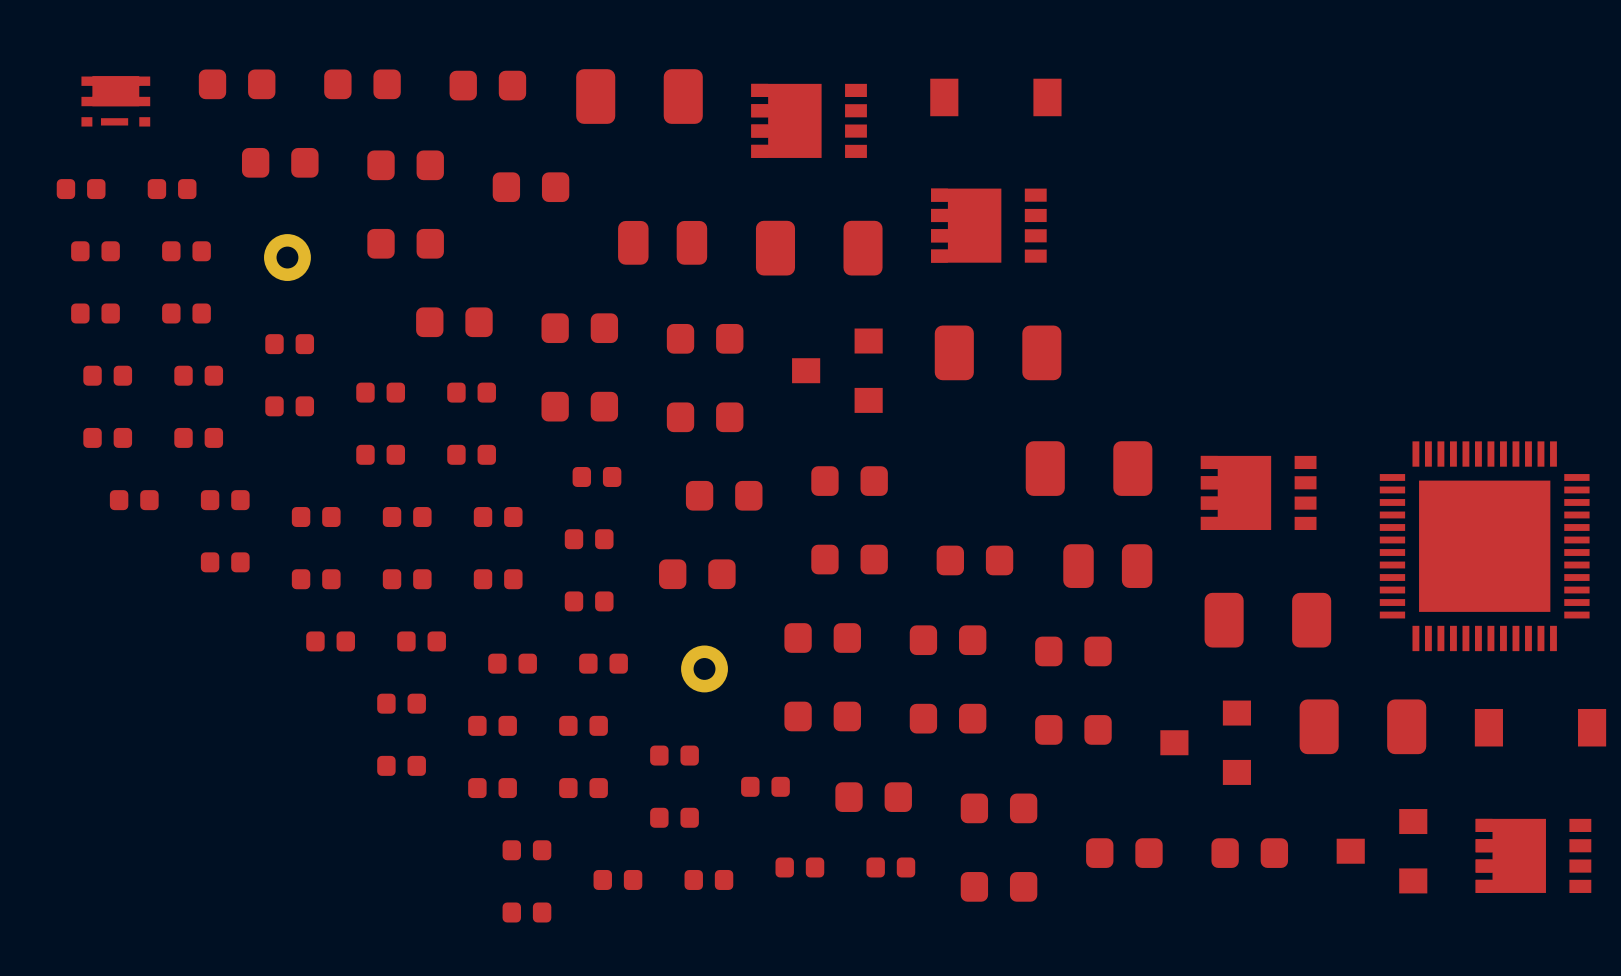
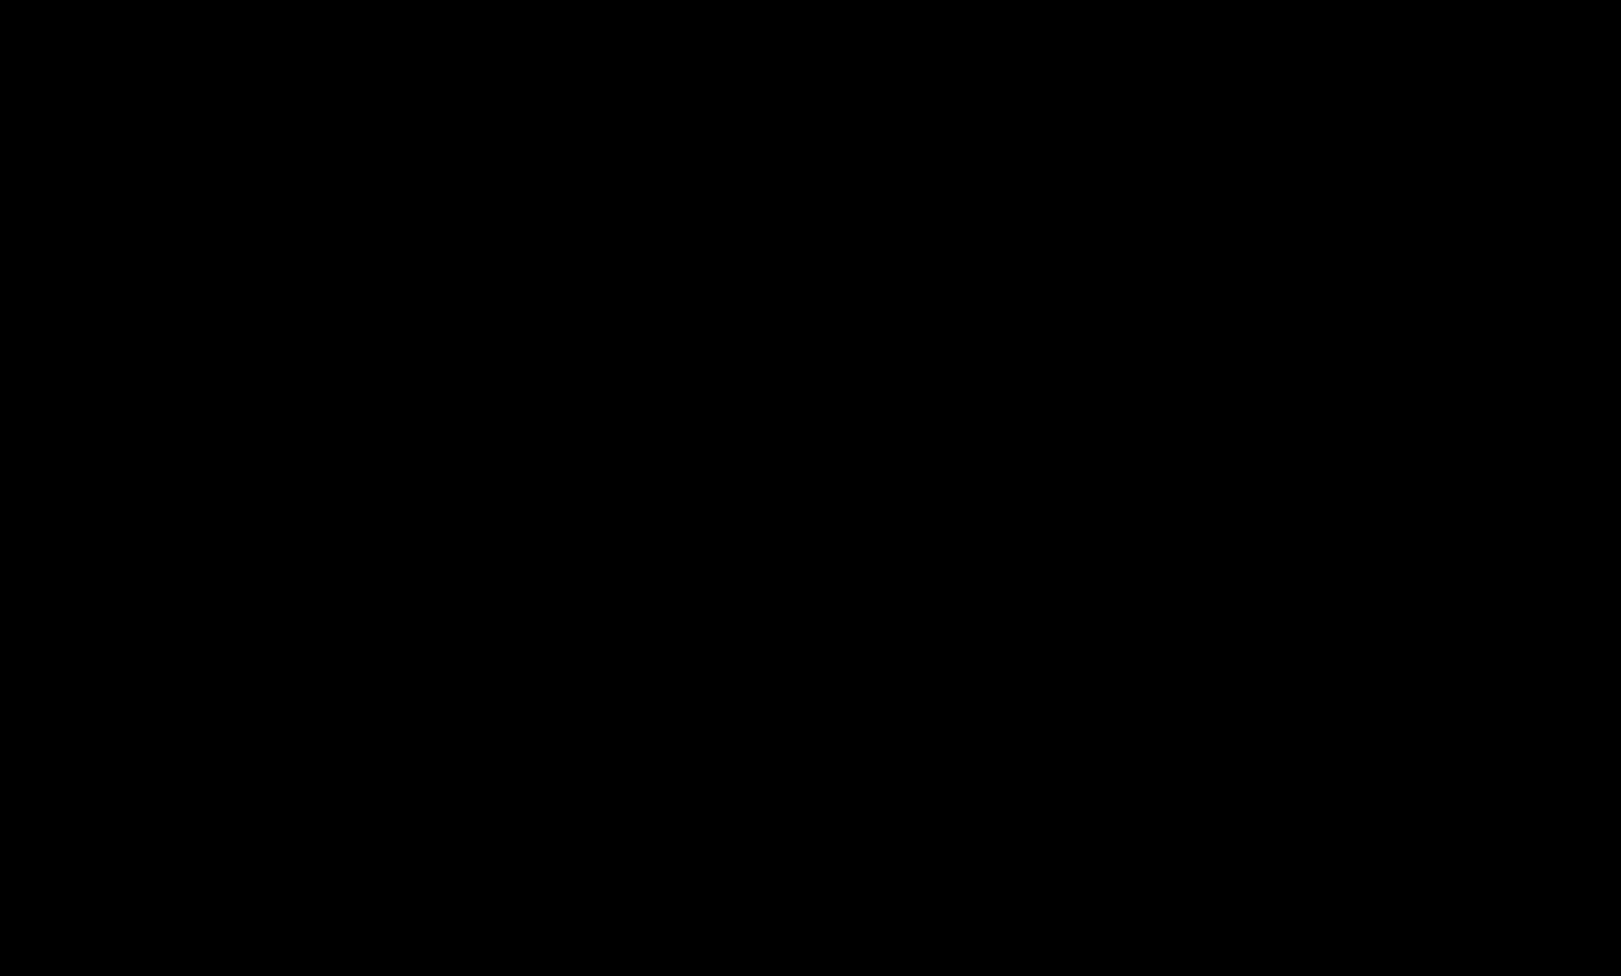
part: (237, 84) -> none
part: (362, 84) -> none
part: (487, 85) -> none
part: (639, 96) -> none
part: (995, 97) -> none
part: (115, 101) -> none
part: (809, 120) -> none
part: (280, 162) -> none
part: (405, 165) -> none
part: (531, 187) -> none
part: (81, 189) -> none
part: (172, 189) -> none
part: (988, 225) -> none
part: (662, 242) -> none
part: (405, 243) -> none
part: (819, 248) -> none
part: (95, 251) -> none
part: (186, 251) -> none
part: (287, 257) -> none
part: (95, 313) -> none
part: (186, 313) -> none
part: (454, 322) -> none
part: (579, 328) -> none
part: (705, 338) -> none
part: (289, 344) -> none
part: (998, 352) -> none
part: (837, 370) -> none
part: (107, 375) -> none
part: (198, 375) -> none
part: (380, 392) -> none
part: (471, 392) -> none
part: (289, 406) -> none
part: (579, 406) -> none
part: (705, 417) -> none
part: (107, 437) -> none
part: (198, 437) -> none
part: (380, 454) -> none
part: (471, 454) -> none
part: (1089, 468) -> none
part: (596, 477) -> none
part: (849, 481) -> none
part: (1258, 492) -> none
part: (724, 495) -> none
part: (134, 500) -> none
part: (225, 500) -> none
part: (316, 517) -> none
part: (407, 517) -> none
part: (498, 517) -> none
part: (589, 539) -> none
part: (1484, 546) -> none
part: (849, 559) -> none
part: (974, 560) -> none
part: (225, 562) -> none
part: (1107, 566) -> none
part: (697, 574) -> none
part: (316, 579) -> none
part: (407, 579) -> none
part: (498, 579) -> none
part: (589, 601) -> none
part: (1267, 620) -> none
part: (822, 638) -> none
part: (948, 640) -> none
part: (330, 641) -> none
part: (421, 641) -> none
part: (1073, 651) -> none
part: (512, 663) -> none
part: (603, 663) -> none
part: (704, 668) -> none
part: (401, 703) -> none
part: (822, 716) -> none
part: (948, 718) -> none
part: (492, 725) -> none
part: (583, 725) -> none
part: (1362, 726) -> none
part: (1540, 727) -> none
part: (1073, 729) -> none
part: (1205, 742) -> none
part: (674, 755) -> none
part: (401, 765) -> none
part: (765, 786) -> none
part: (492, 788) -> none
part: (583, 788) -> none
part: (873, 797) -> none
part: (999, 808) -> none
part: (674, 817) -> none
part: (526, 850) -> none
part: (1381, 851) -> none
part: (1124, 853) -> none
part: (1249, 853) -> none
part: (1533, 855) -> none
part: (799, 867) -> none
part: (890, 867) -> none
part: (617, 879) -> none
part: (708, 879) -> none
part: (999, 886) -> none
part: (526, 912) -> none

